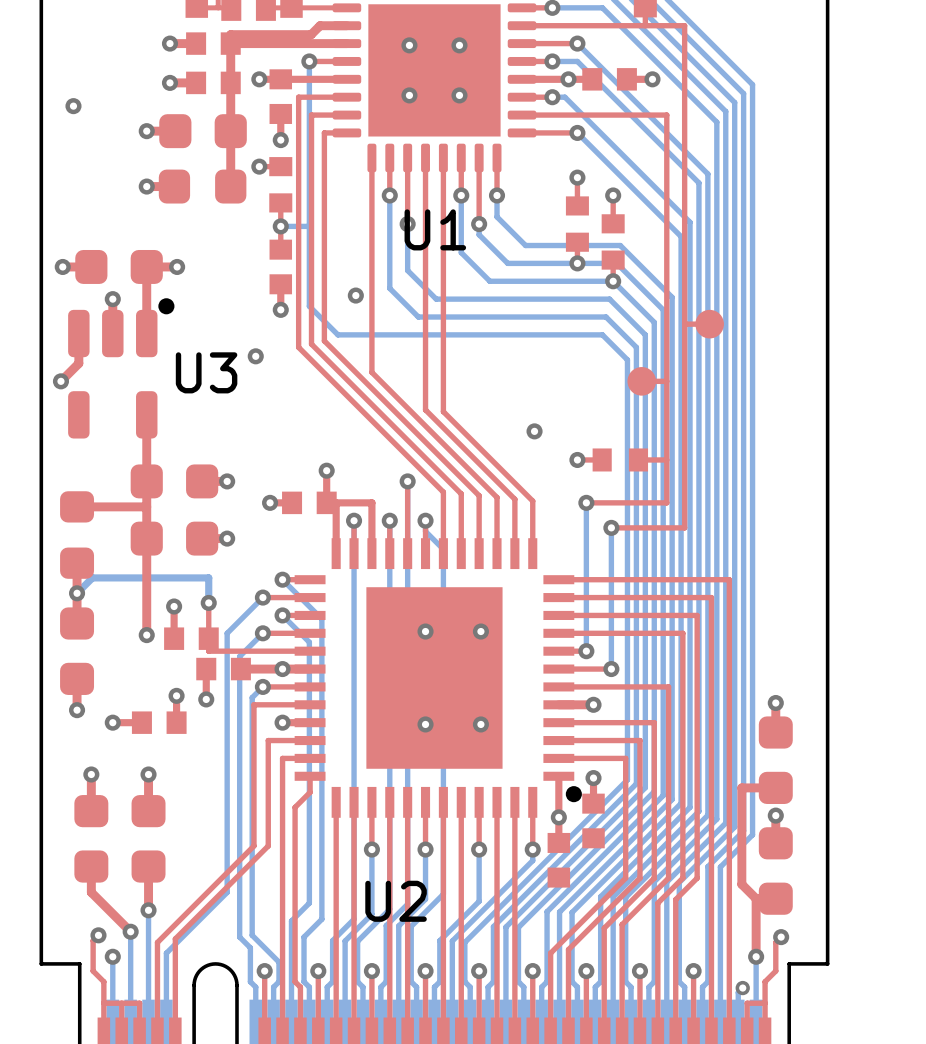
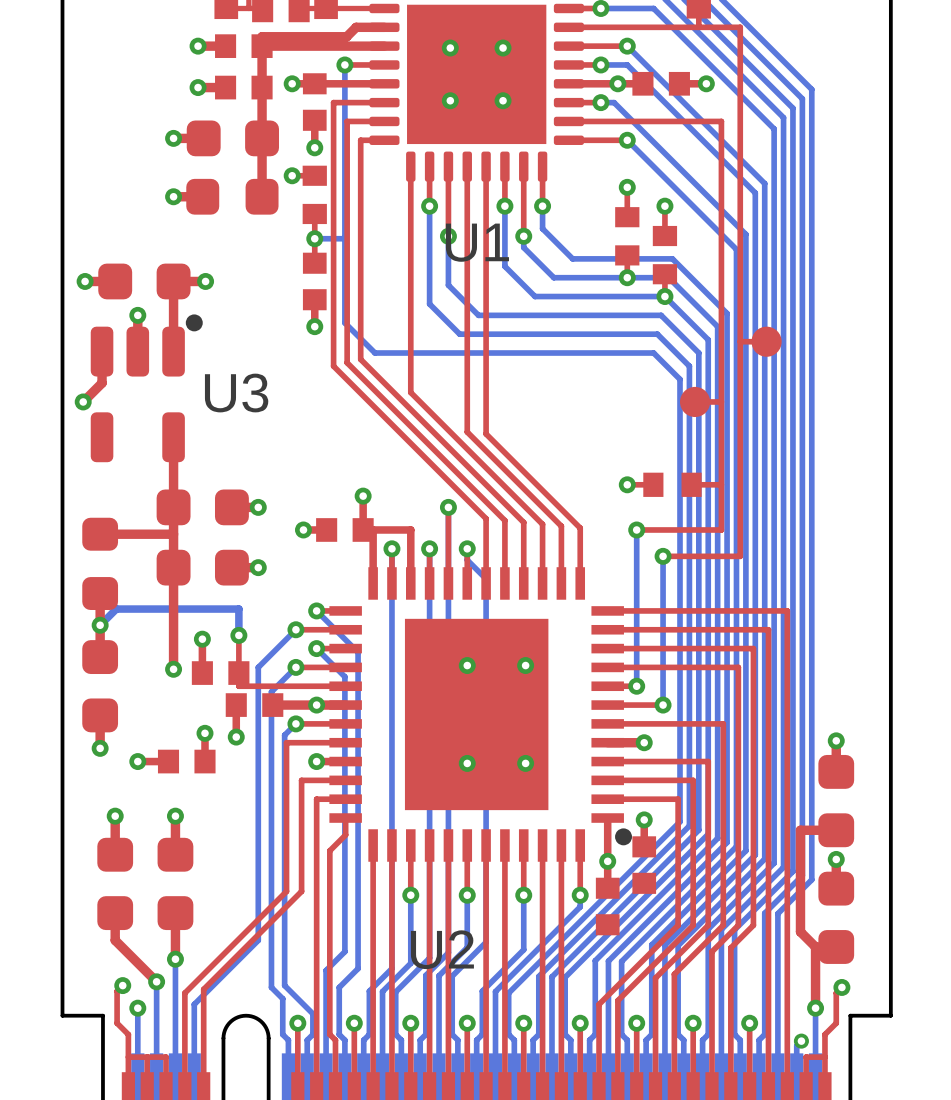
via: (73, 106) -> none
via: (355, 295) -> none
via: (255, 356) -> none
via: (534, 431) -> none

